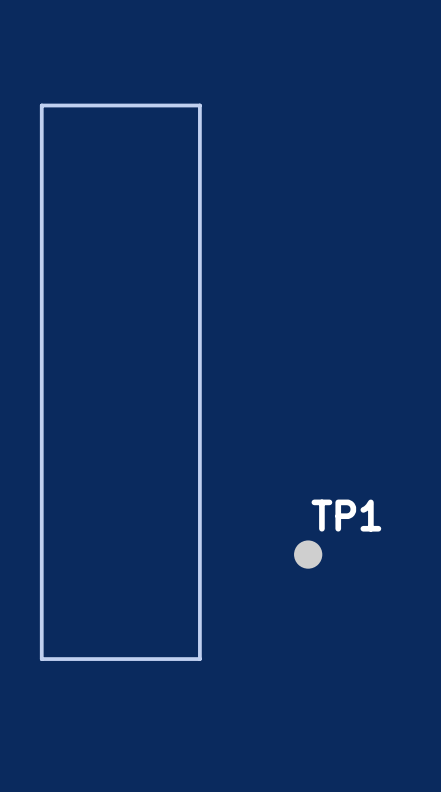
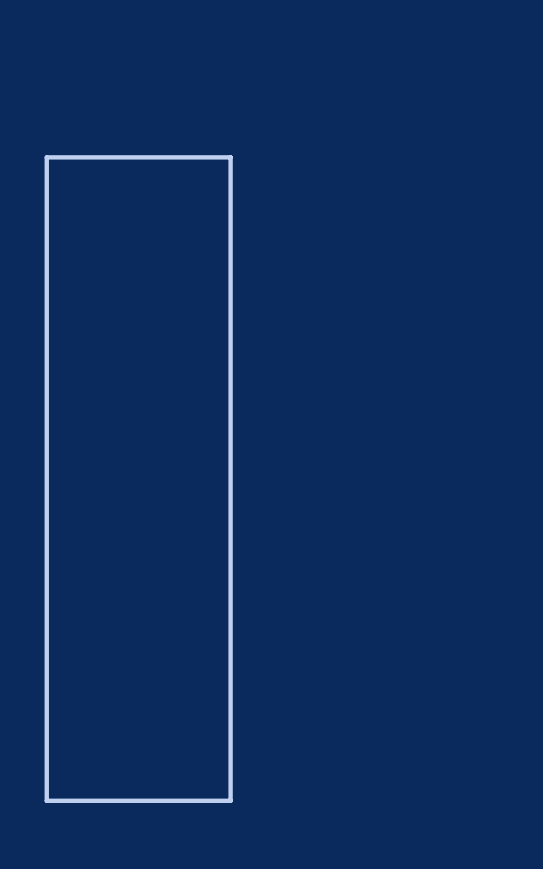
TP1: (308, 554) -> none

